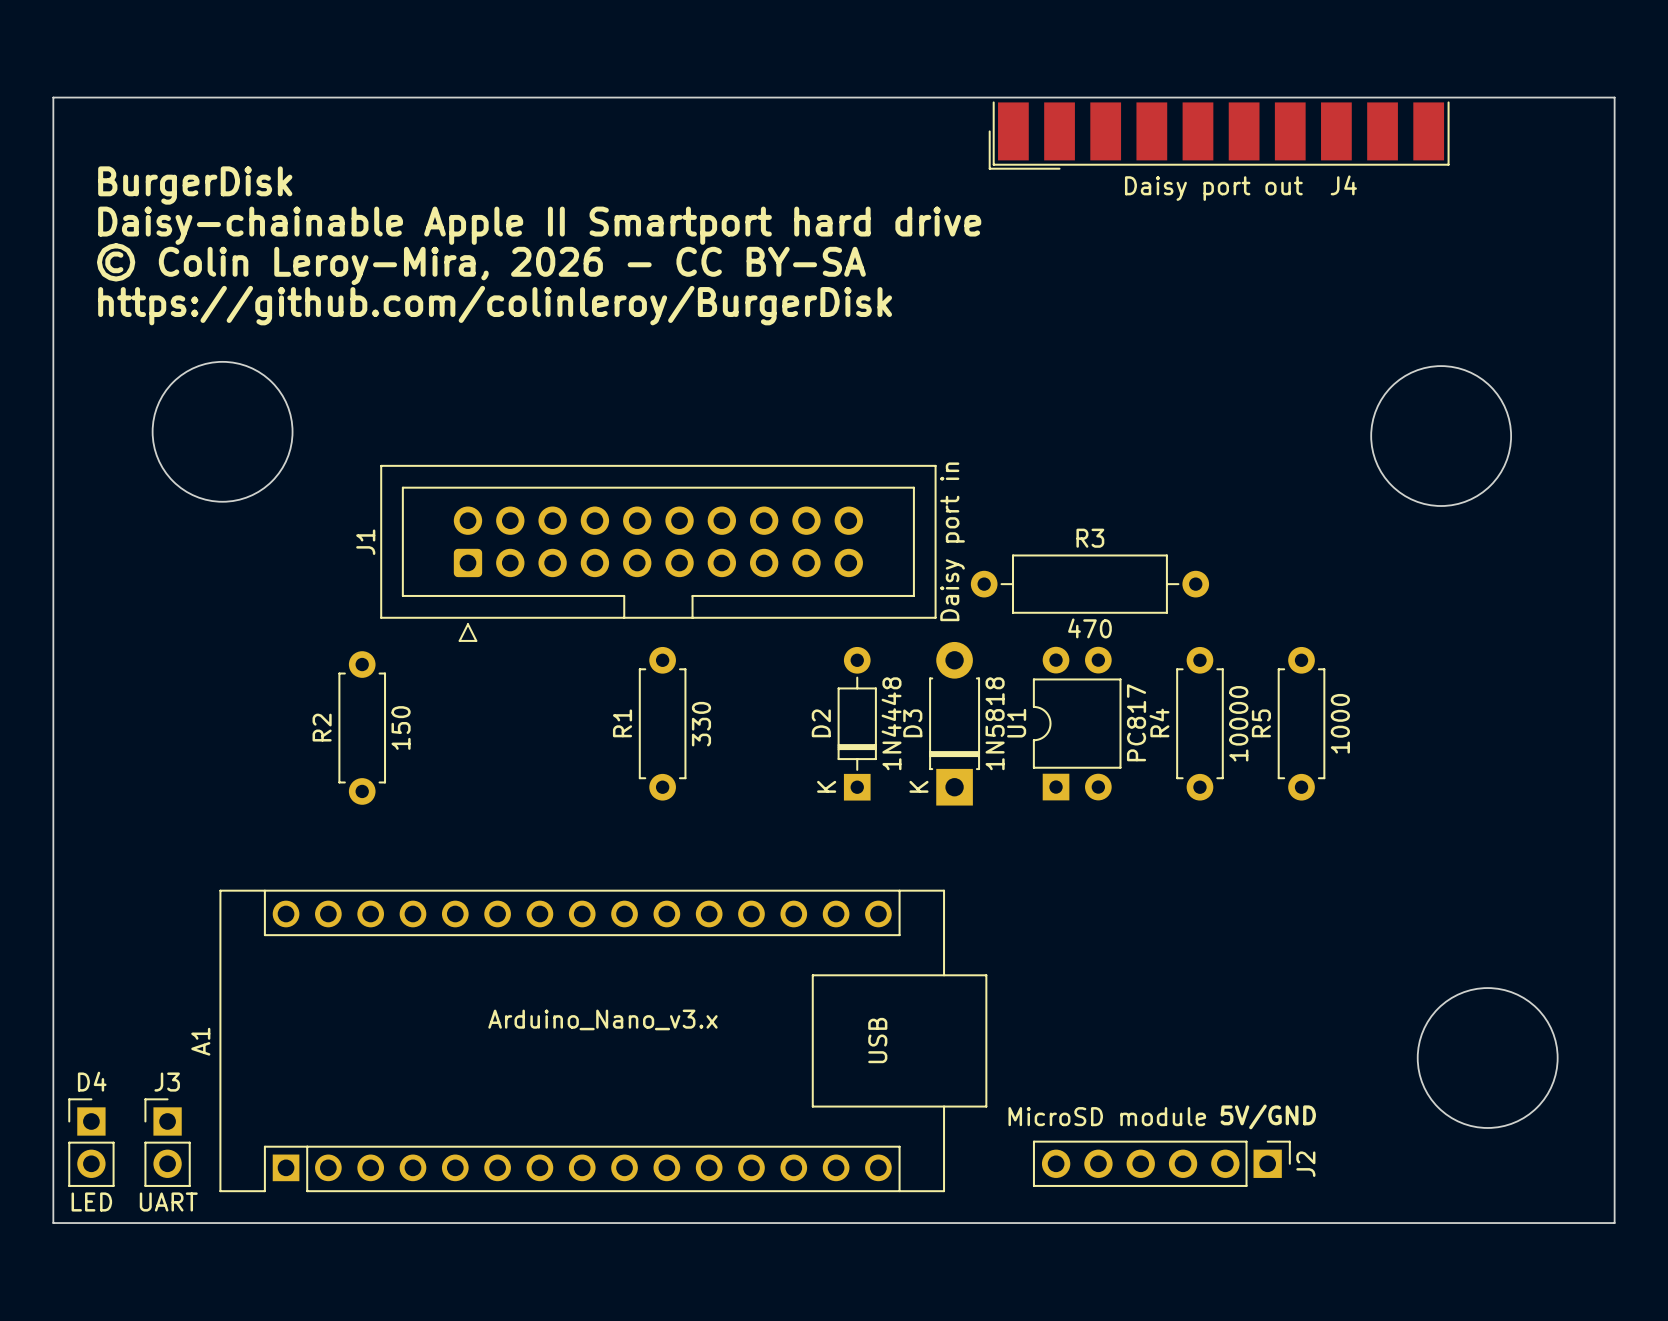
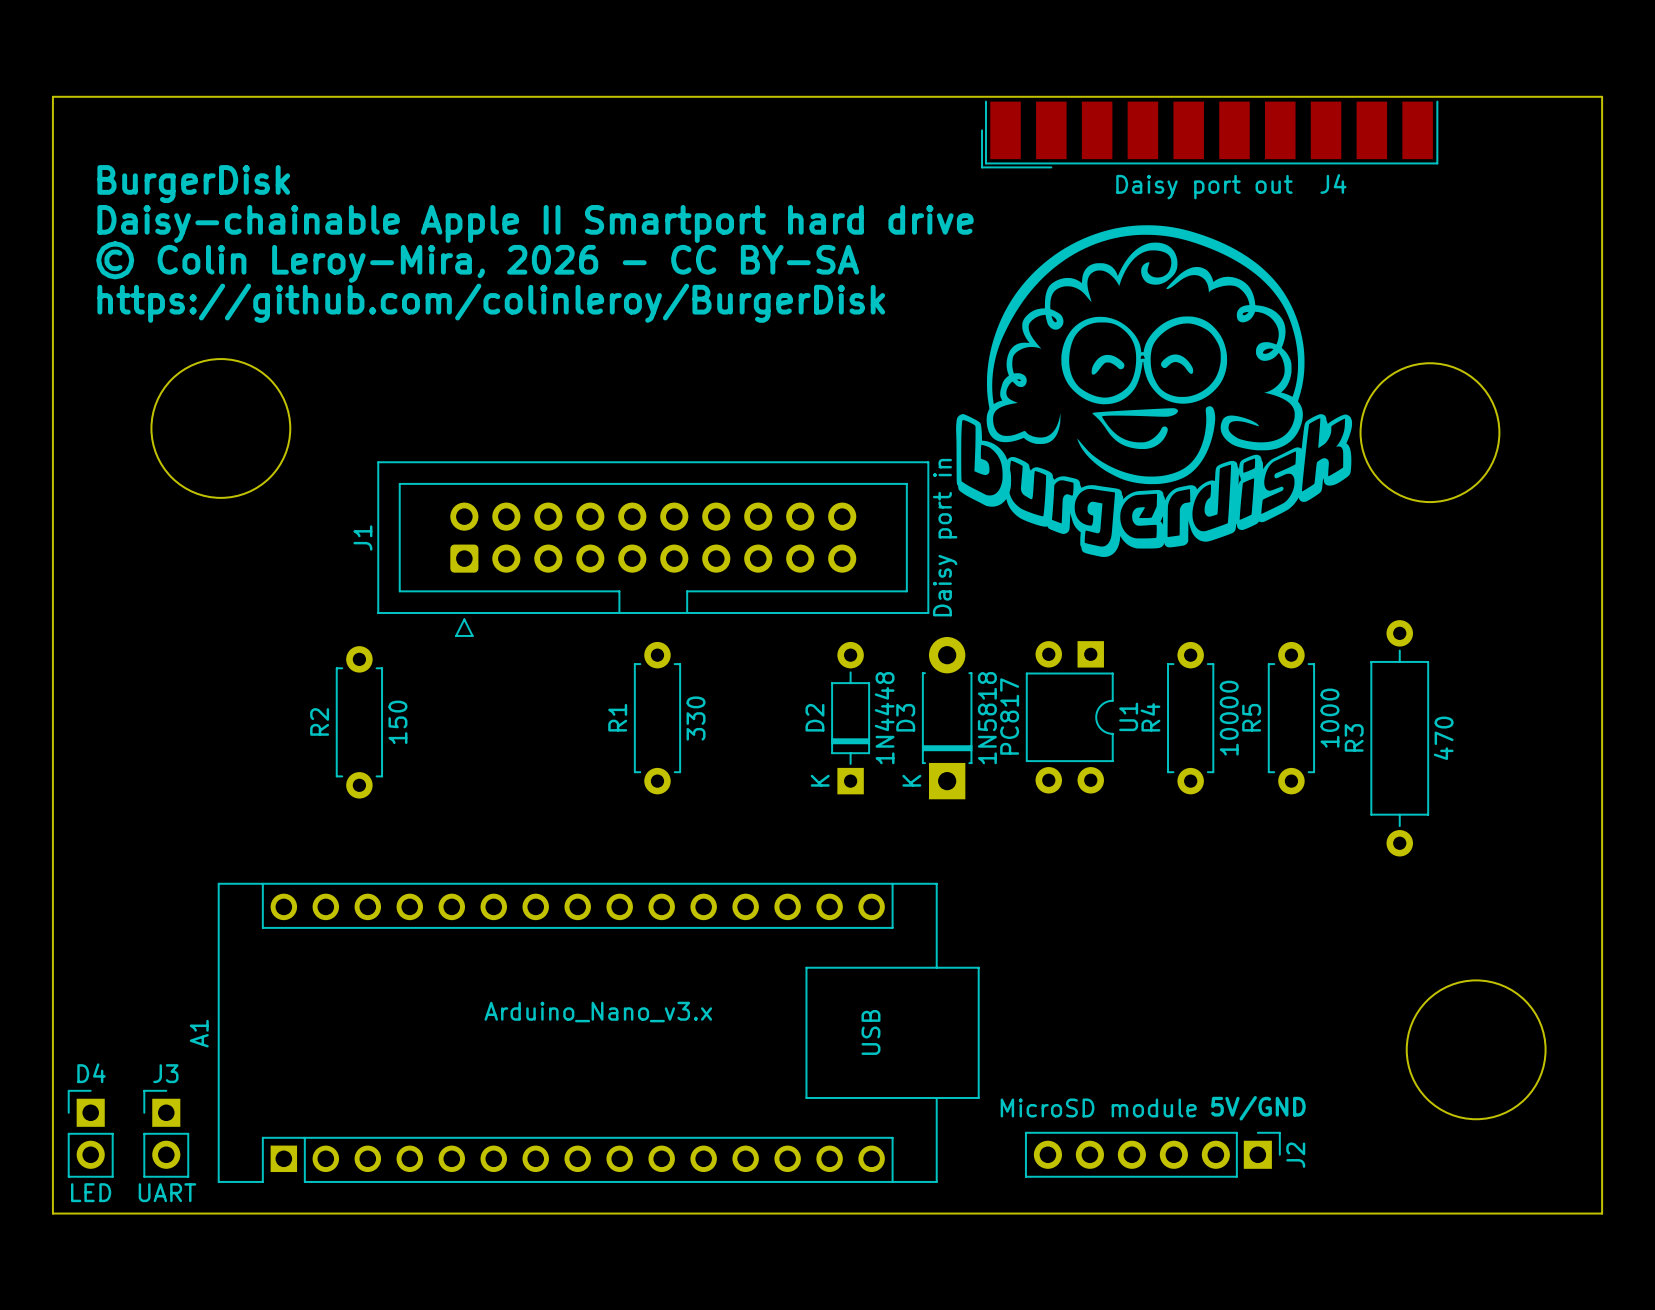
drawing: none -> [956, 225, 1353, 557]
R3 name position: R3 (1090, 538) -> R3 (1354, 737)
R3 rotation: 0° (1089, 584) -> 90° clockwise (1399, 738)
R3 position: (1089, 584) -> (1399, 738)
R3 value position: 470 (1089, 628) -> 470 (1443, 738)
U1 rotation: 0° (1077, 723) -> 180° (1069, 717)

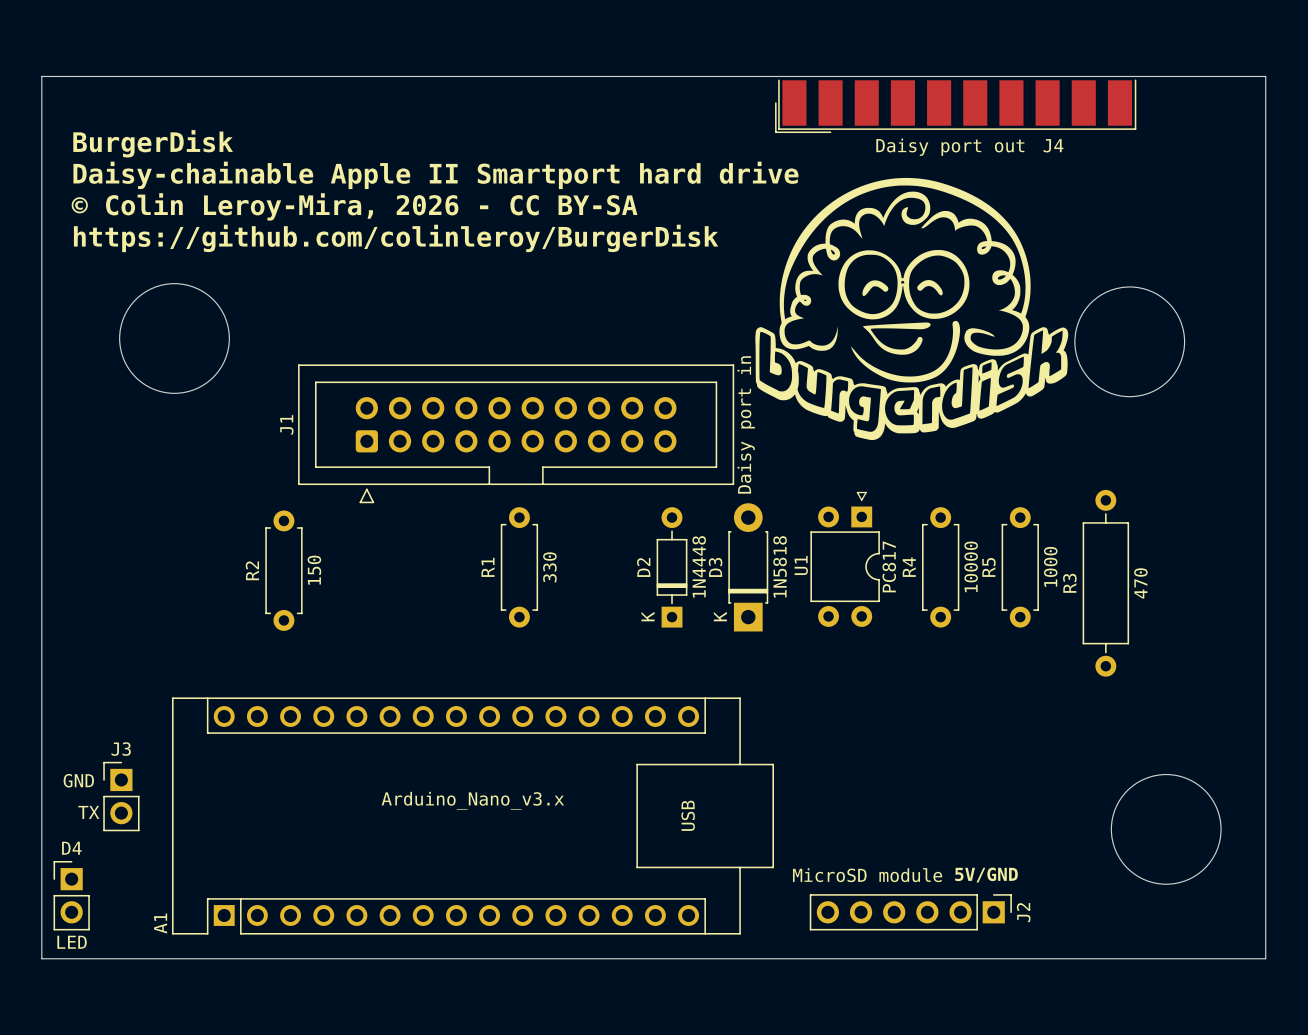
U1 footprint: [1025, 641, 1114, 794] -> [810, 491, 880, 627]
U1 value position: PC817 (1009, 716) -> PC817 (889, 566)
U1 name position: U1 (1128, 716) -> U1 (801, 565)
text: none -> GND (78, 780)
text: none -> TX (88, 812)
A1 name position: A1 (199, 1033) -> A1 (160, 923)
J3 position: (166, 1133) -> (121, 796)
J3 value: UART (167, 1192) -> none

